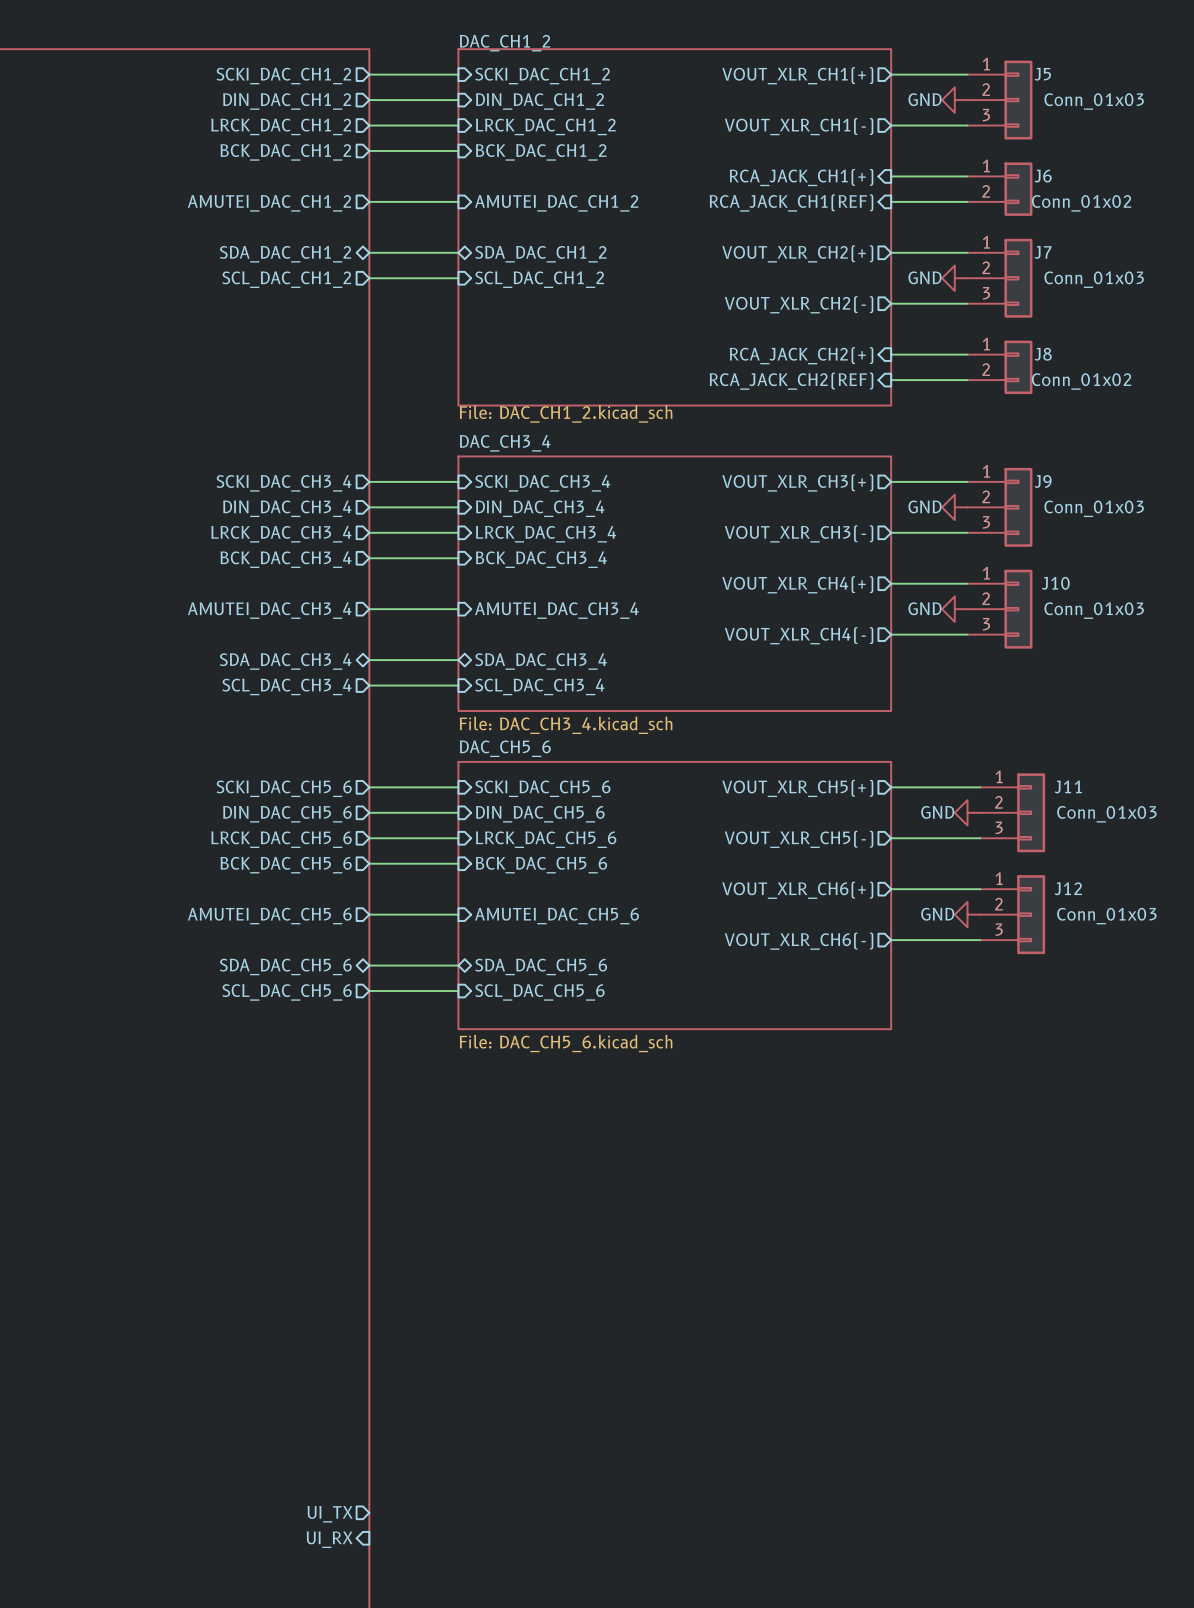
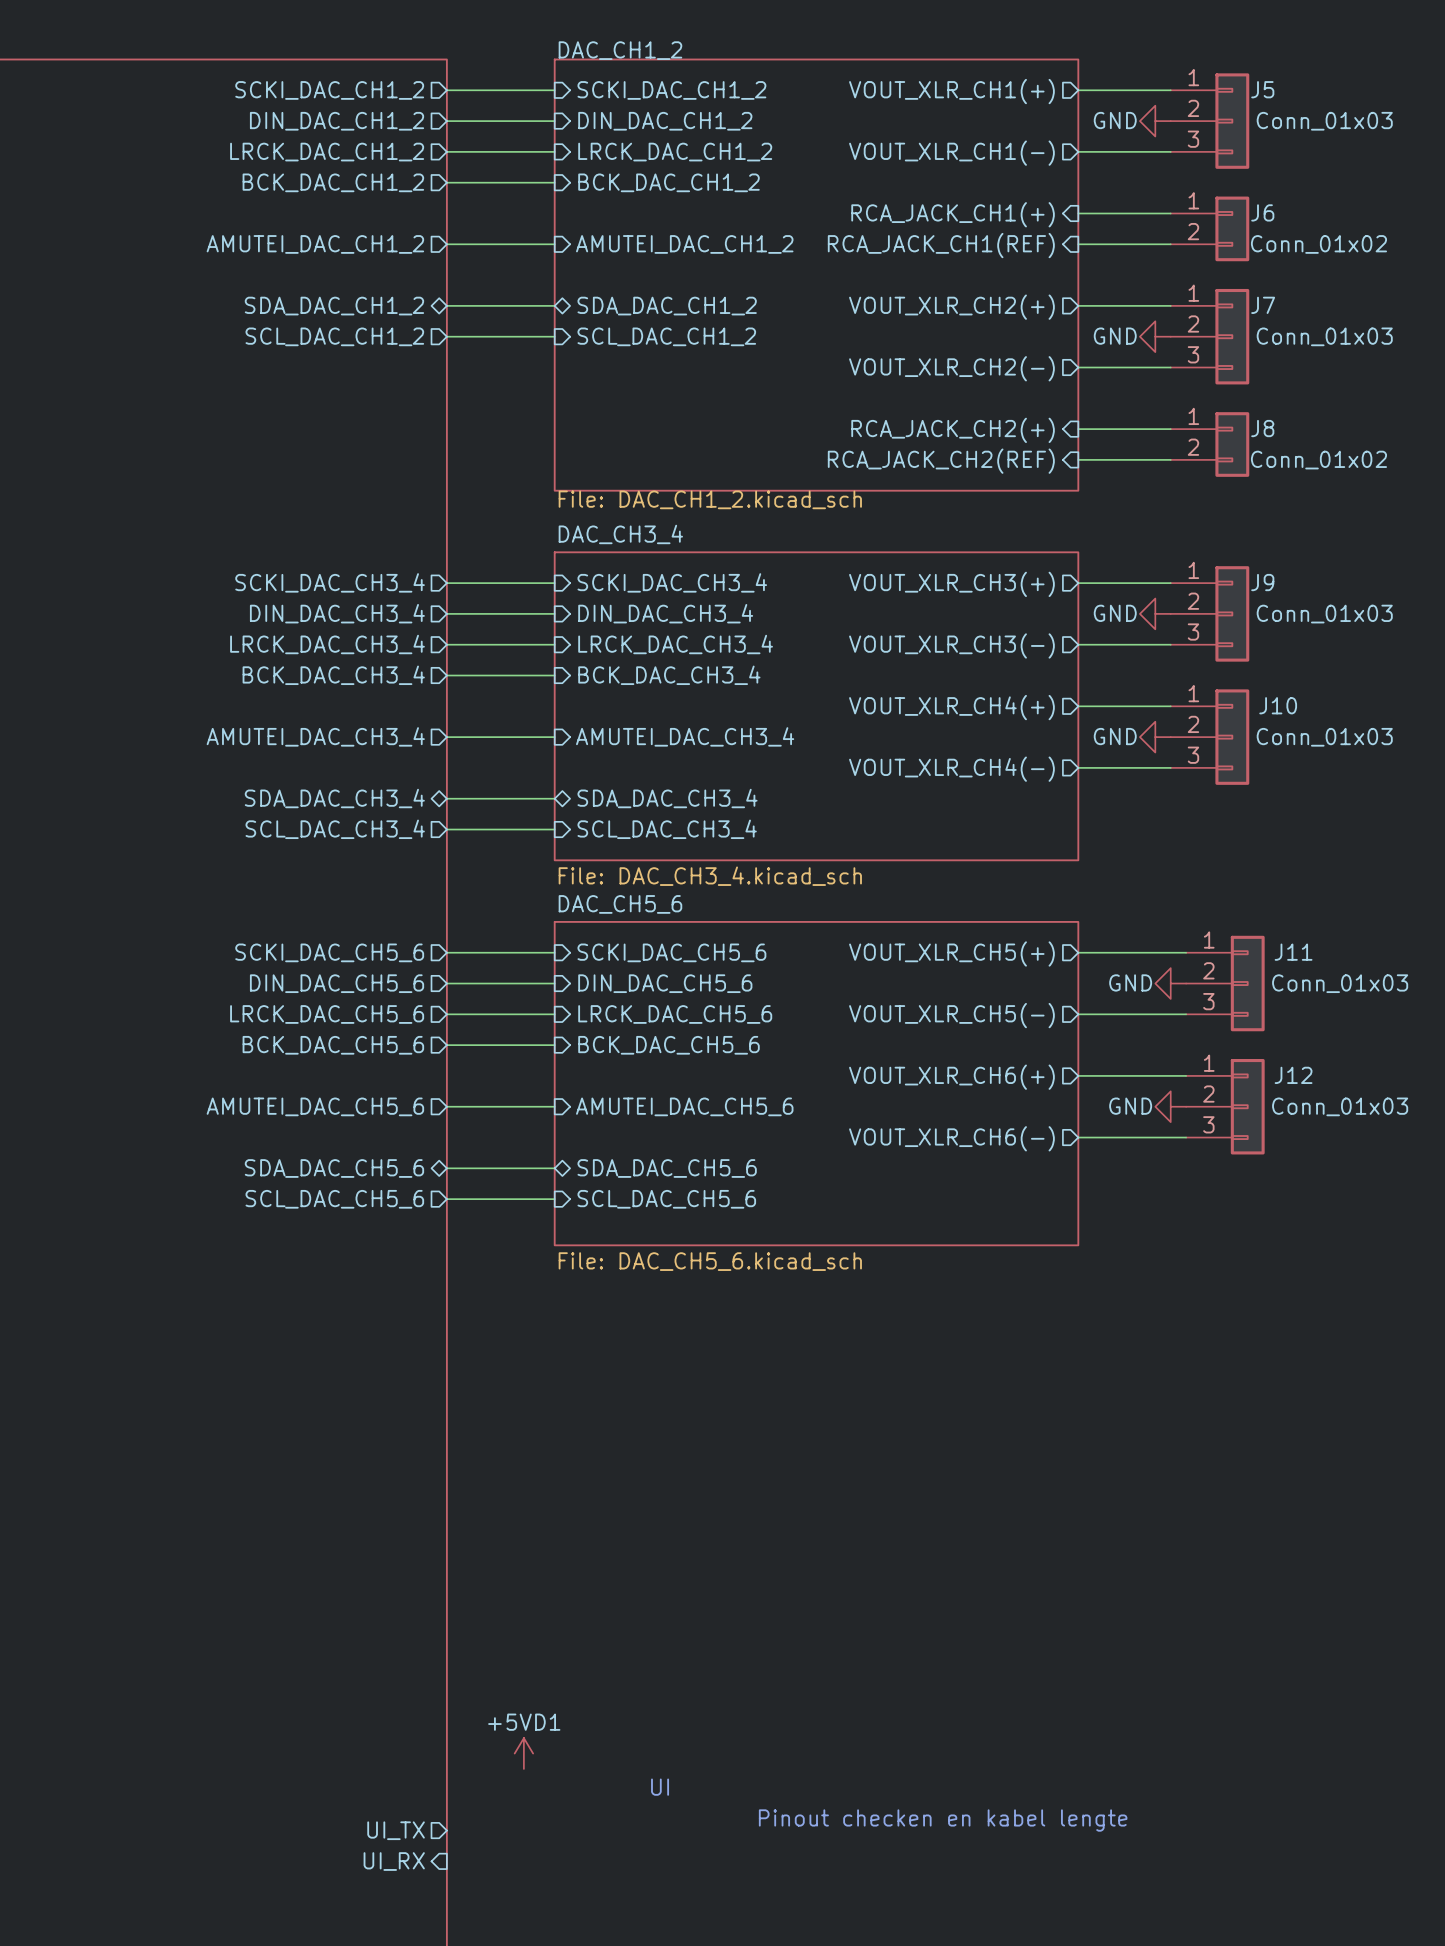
power symbol: none -> +5VD1 (523, 1753)
text: none -> UI (660, 1787)
text: none -> Pinout checken en kabel lengte (943, 1820)

